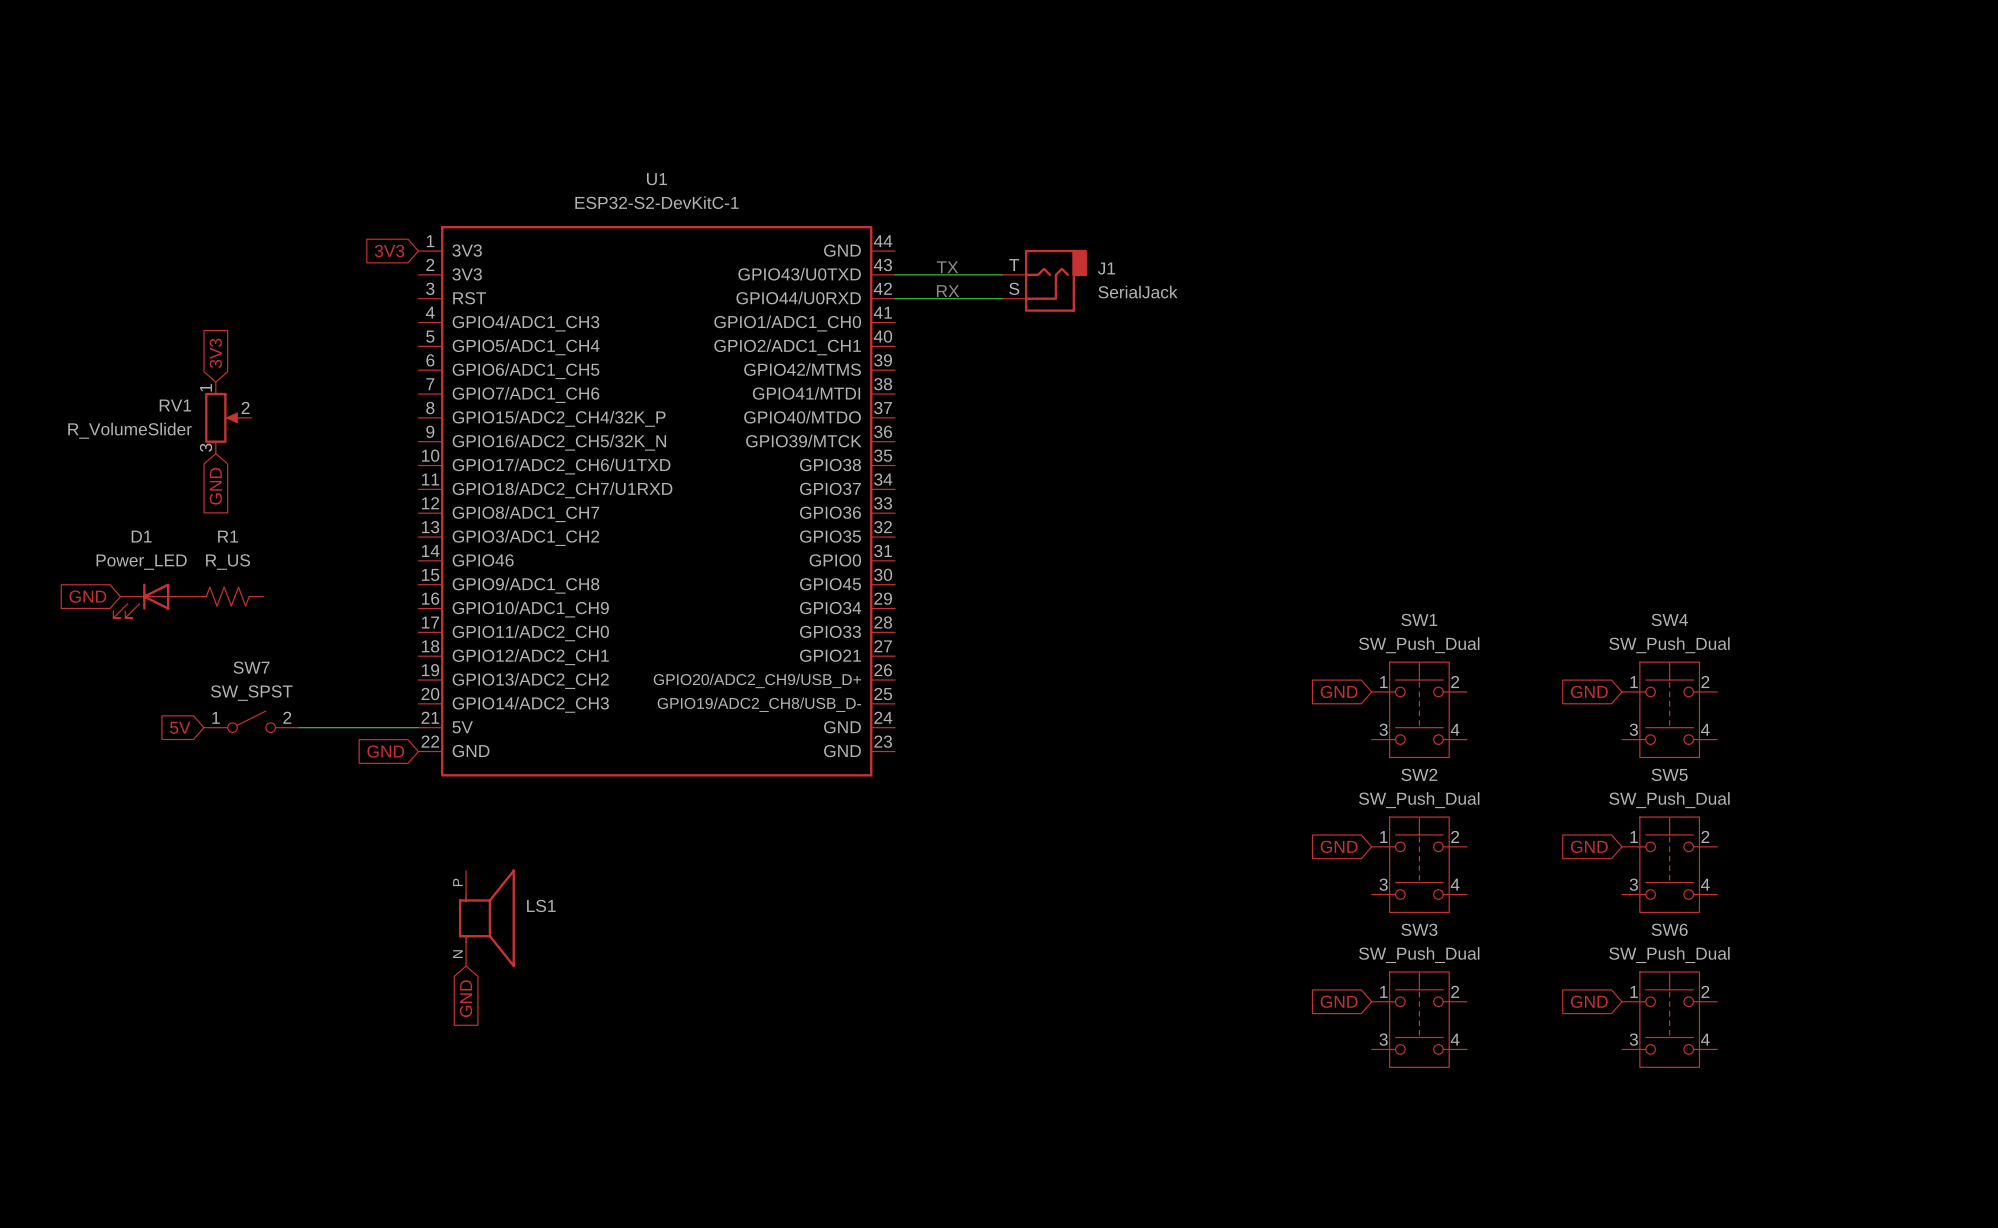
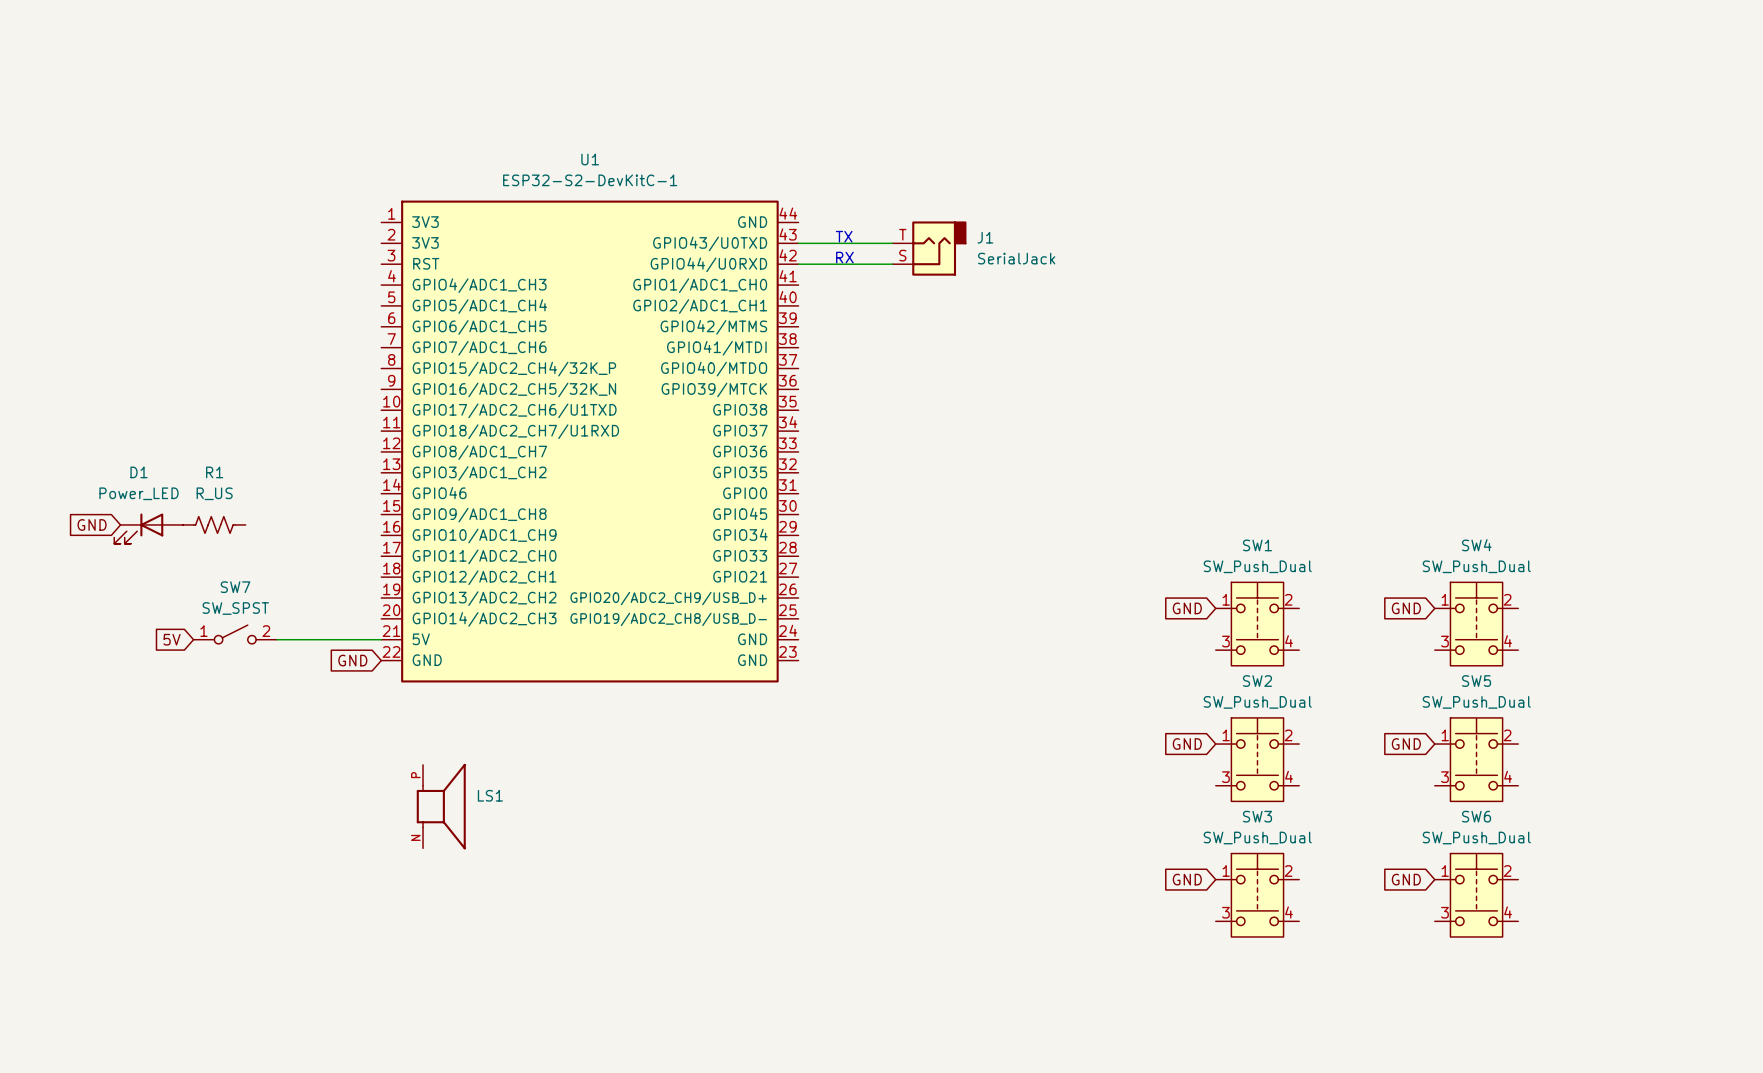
global label: 3V3 (389, 251) -> none
global label: 3V3 (215, 353) -> none
RV1: R_VolumeSlider (228, 417) -> none
global label: GND (215, 486) -> none
global label: GND (466, 998) -> none

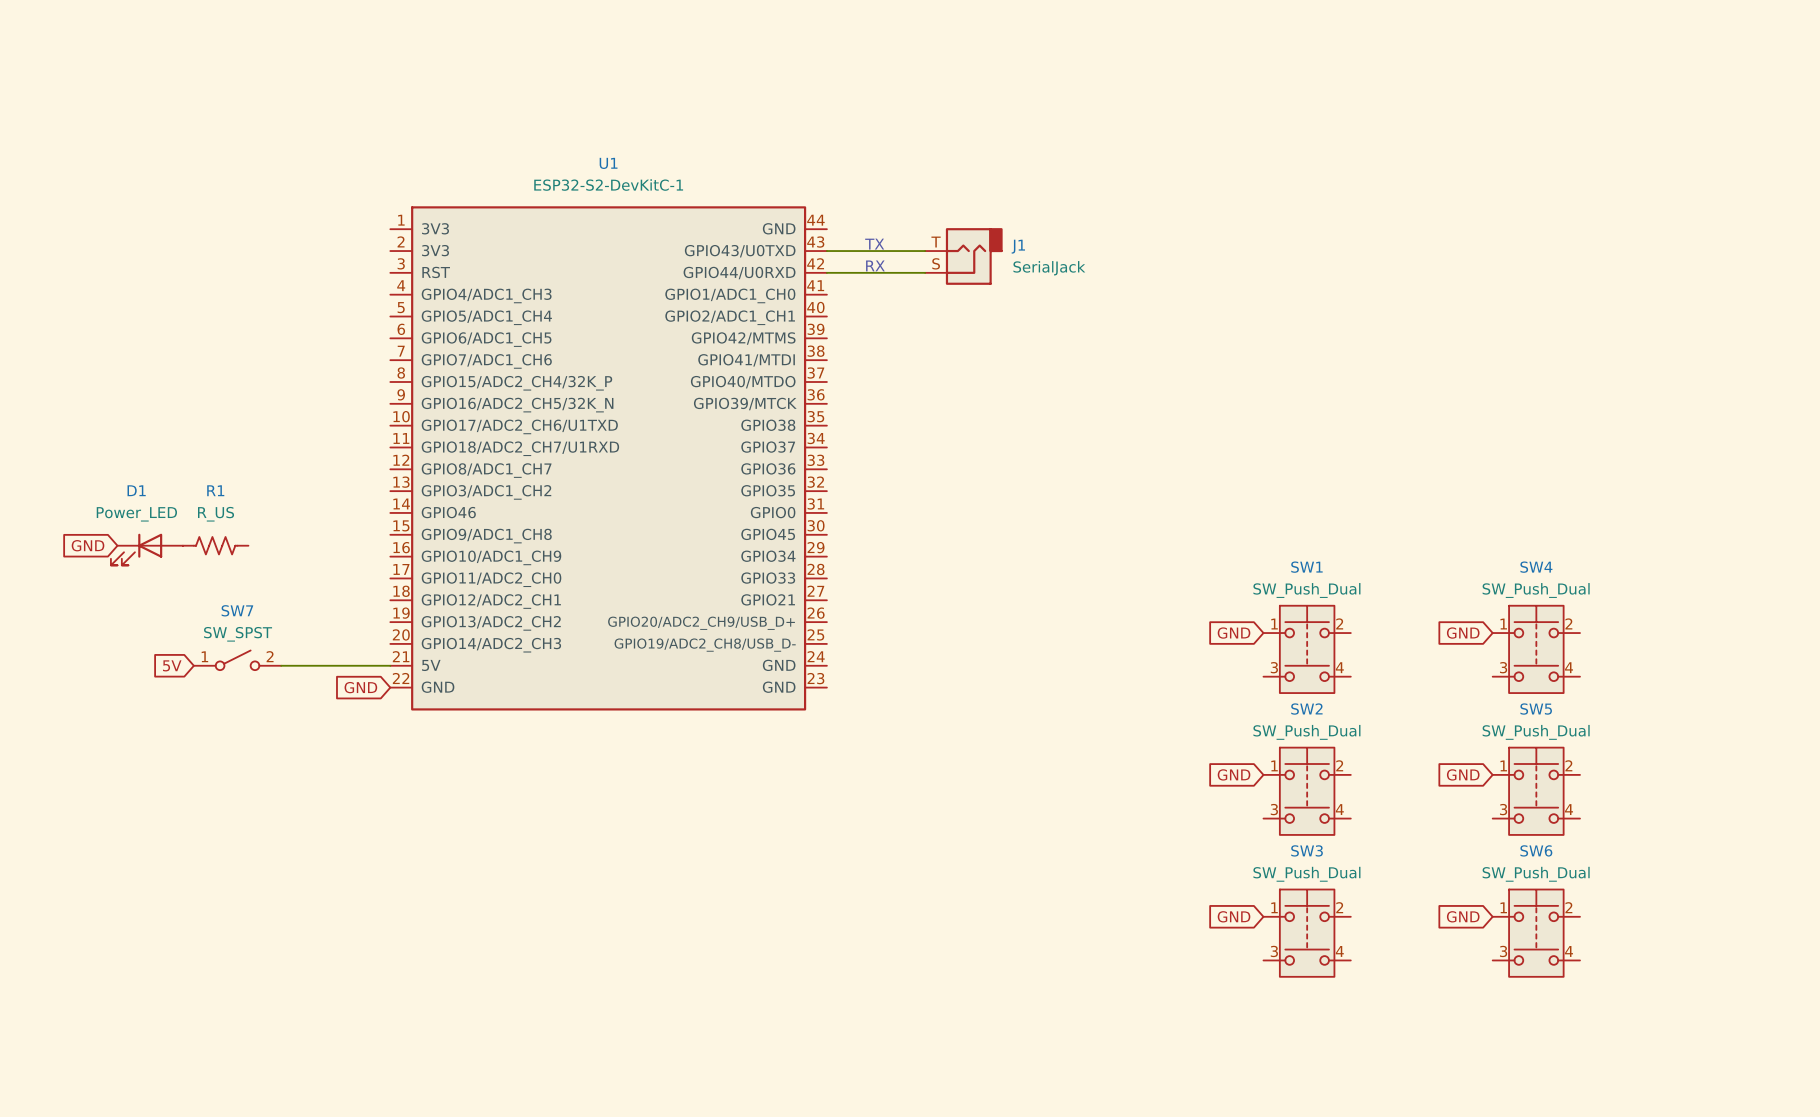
LS1: (441, 806) -> none

